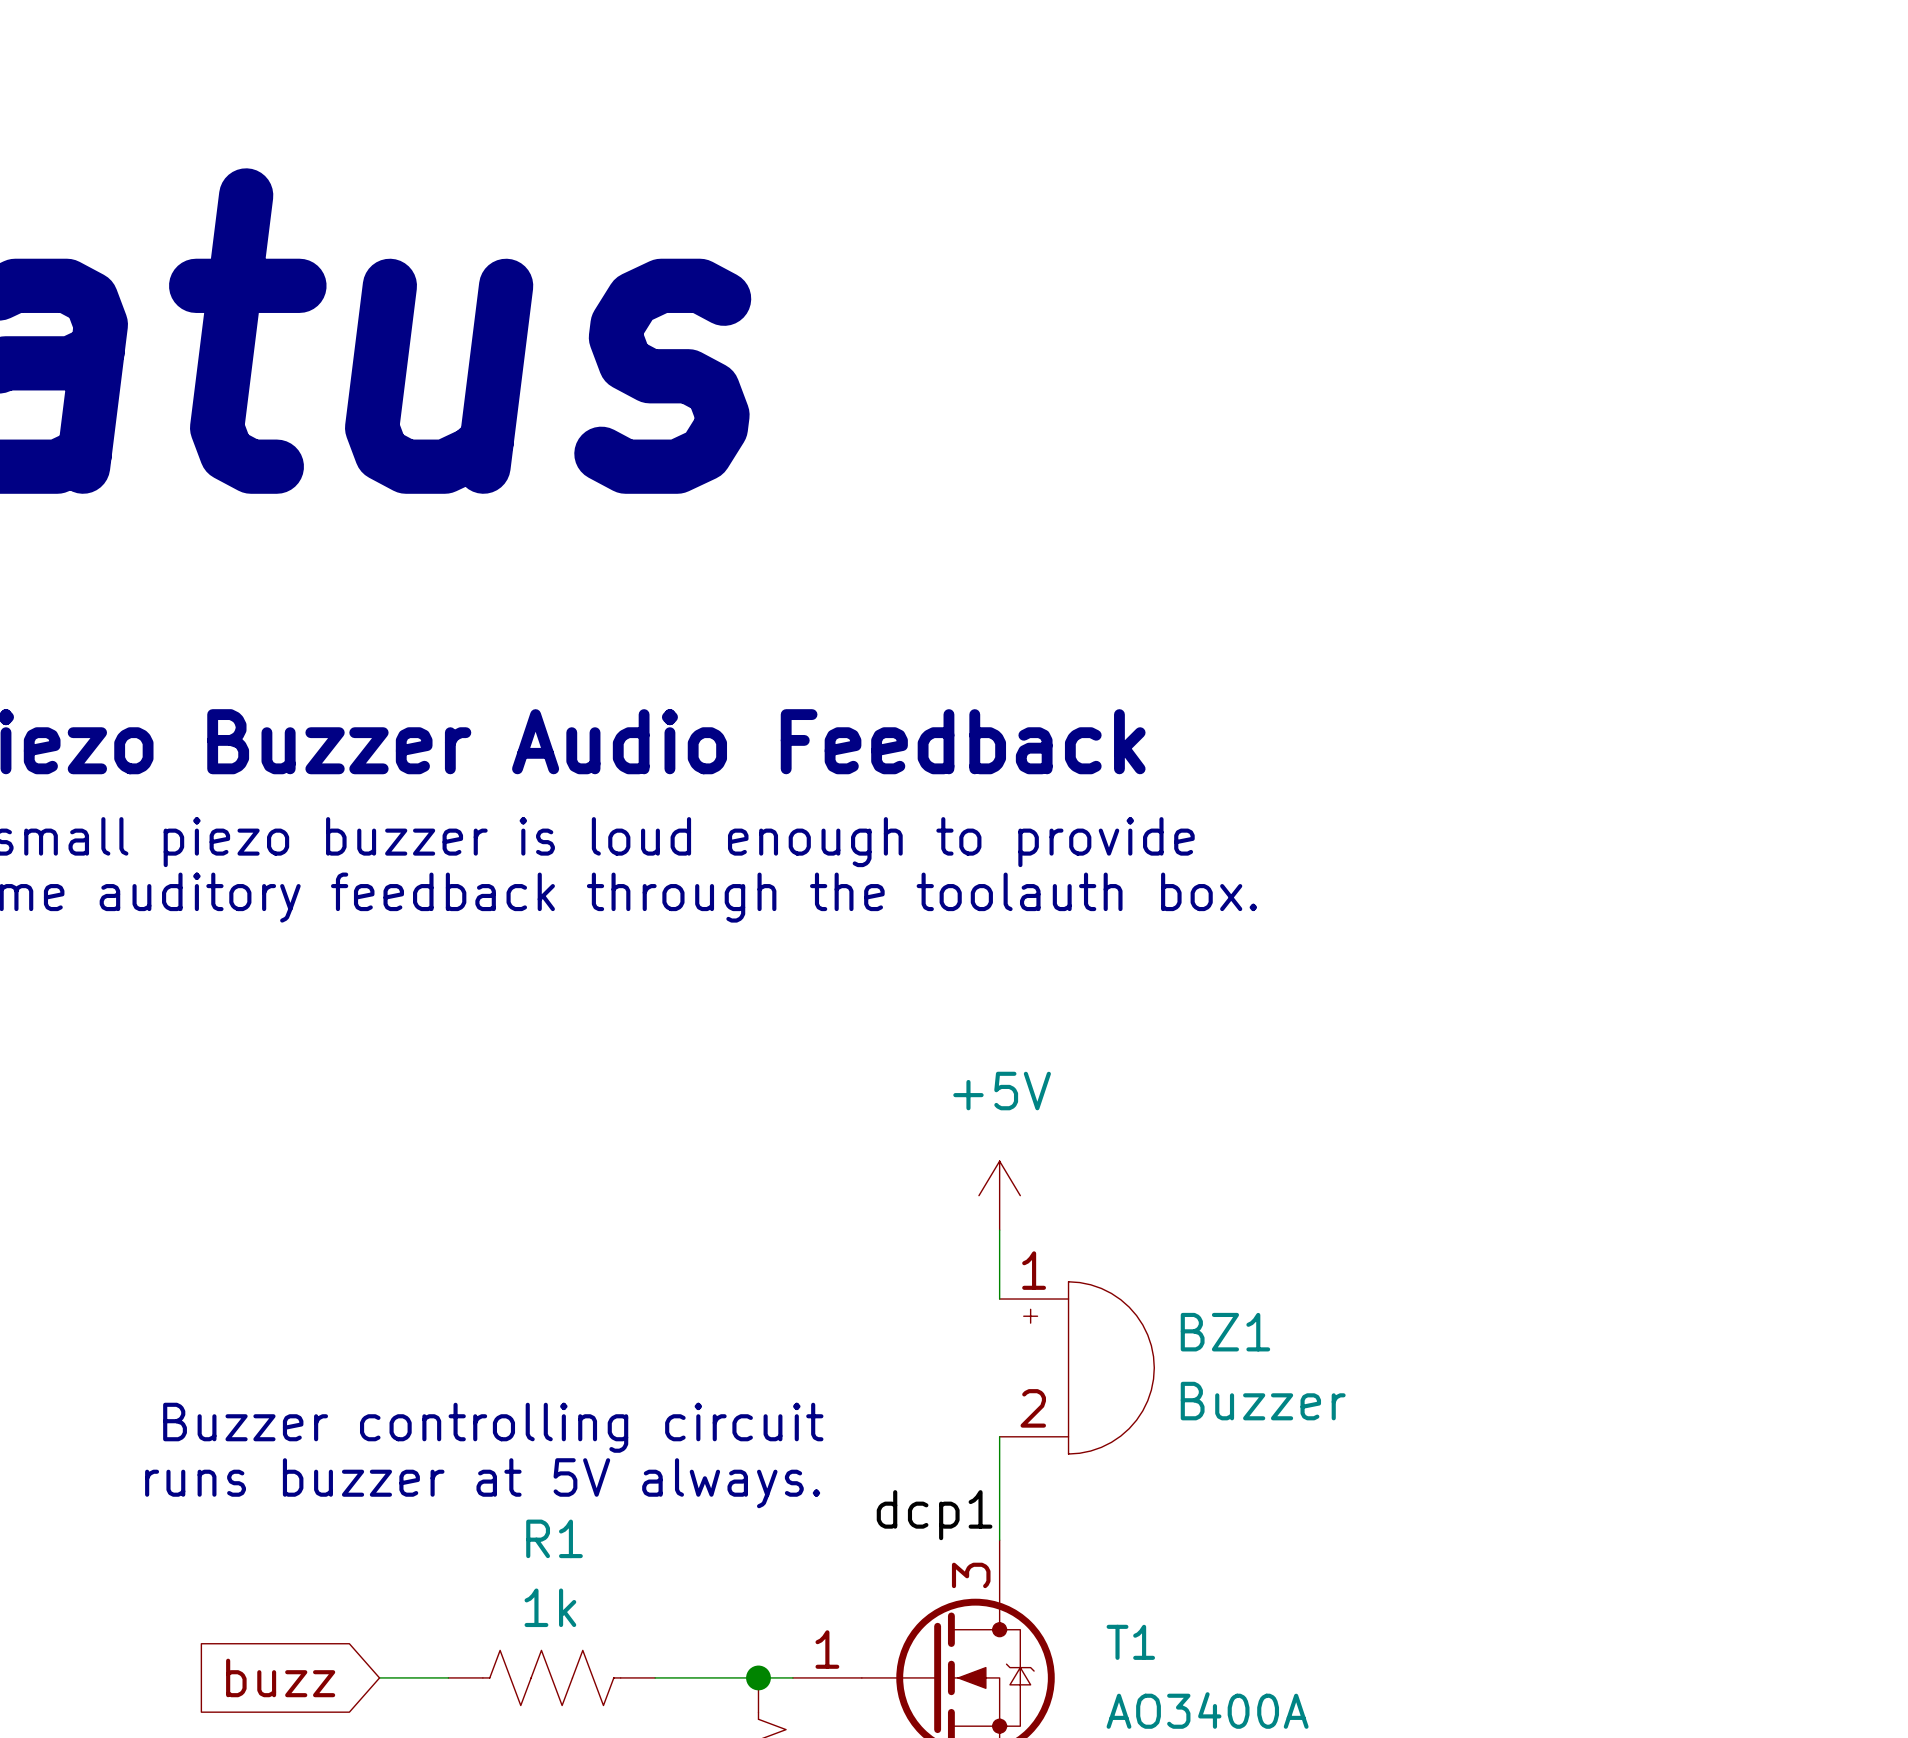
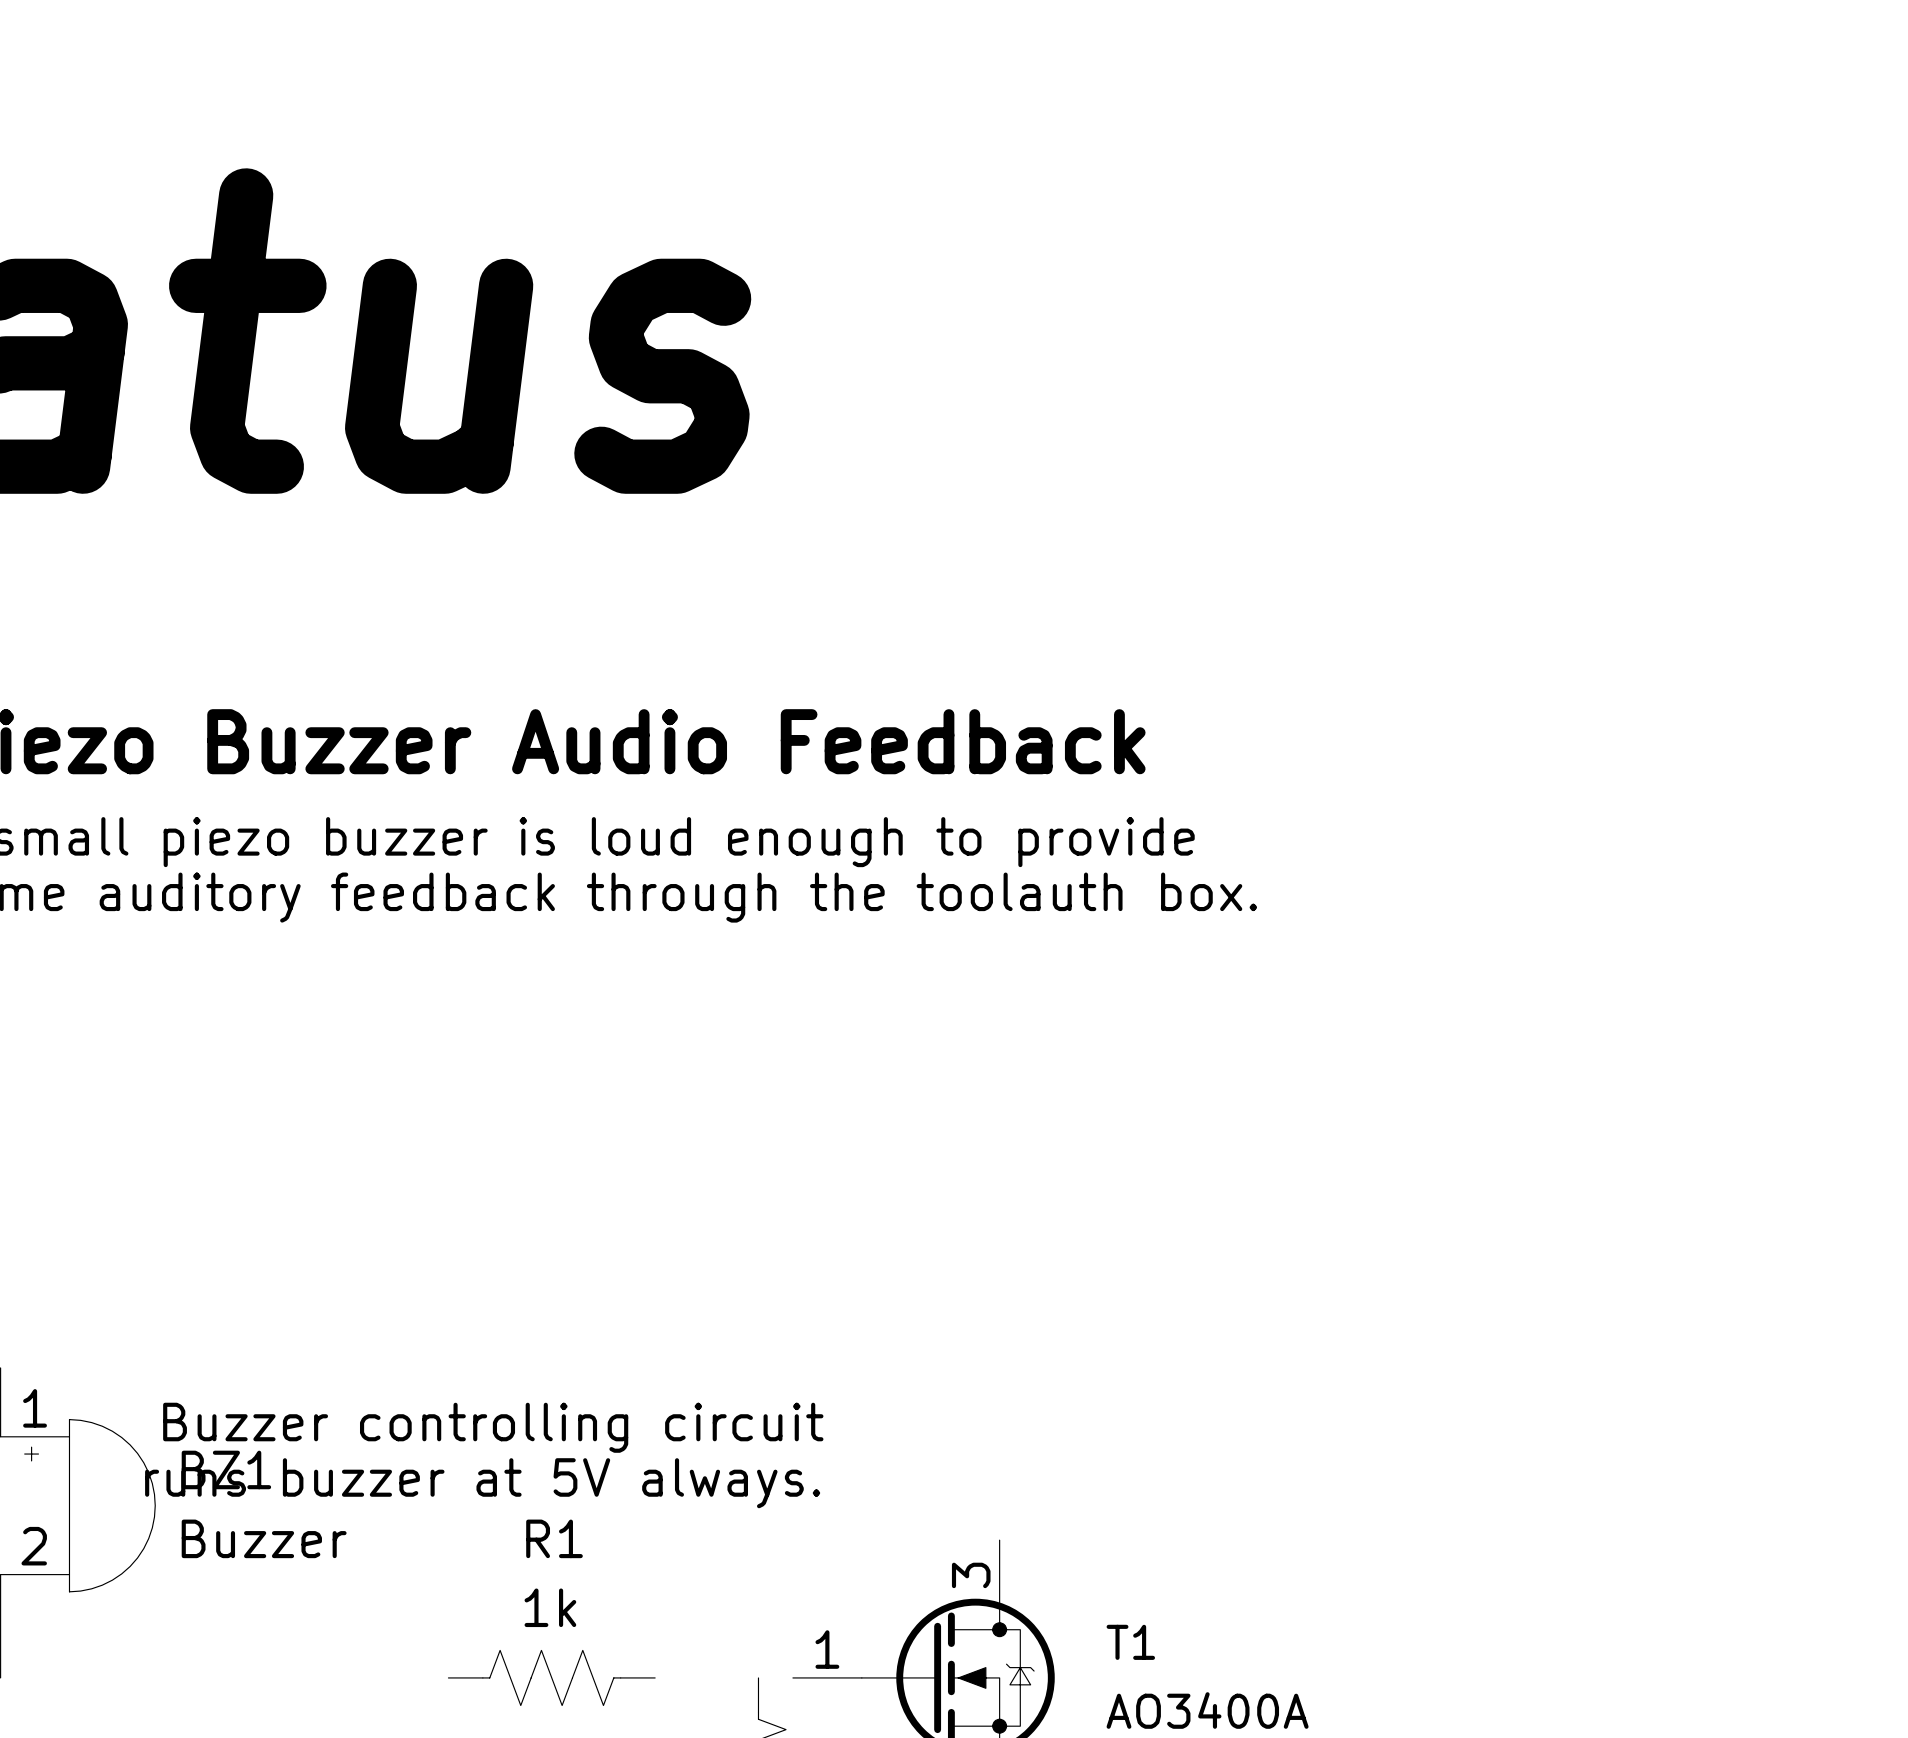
power symbol: +5V (999, 1195) -> none
wire: (999, 1230) (999, 1299) -> none
wire: none -> (0, 1367) (0, 1436)
BZ1 position: (1076, 1367) -> (77, 1505)
wire: (999, 1436) (999, 1540) -> none
label: dcp1 (934, 1515) -> none
wire: none -> (0, 1574) (0, 1677)
global label: buzz (280, 1677) -> none
wire: (379, 1677) (448, 1677) -> none
wire: (655, 1677) (792, 1677) -> none
junction: (758, 1677) -> none

